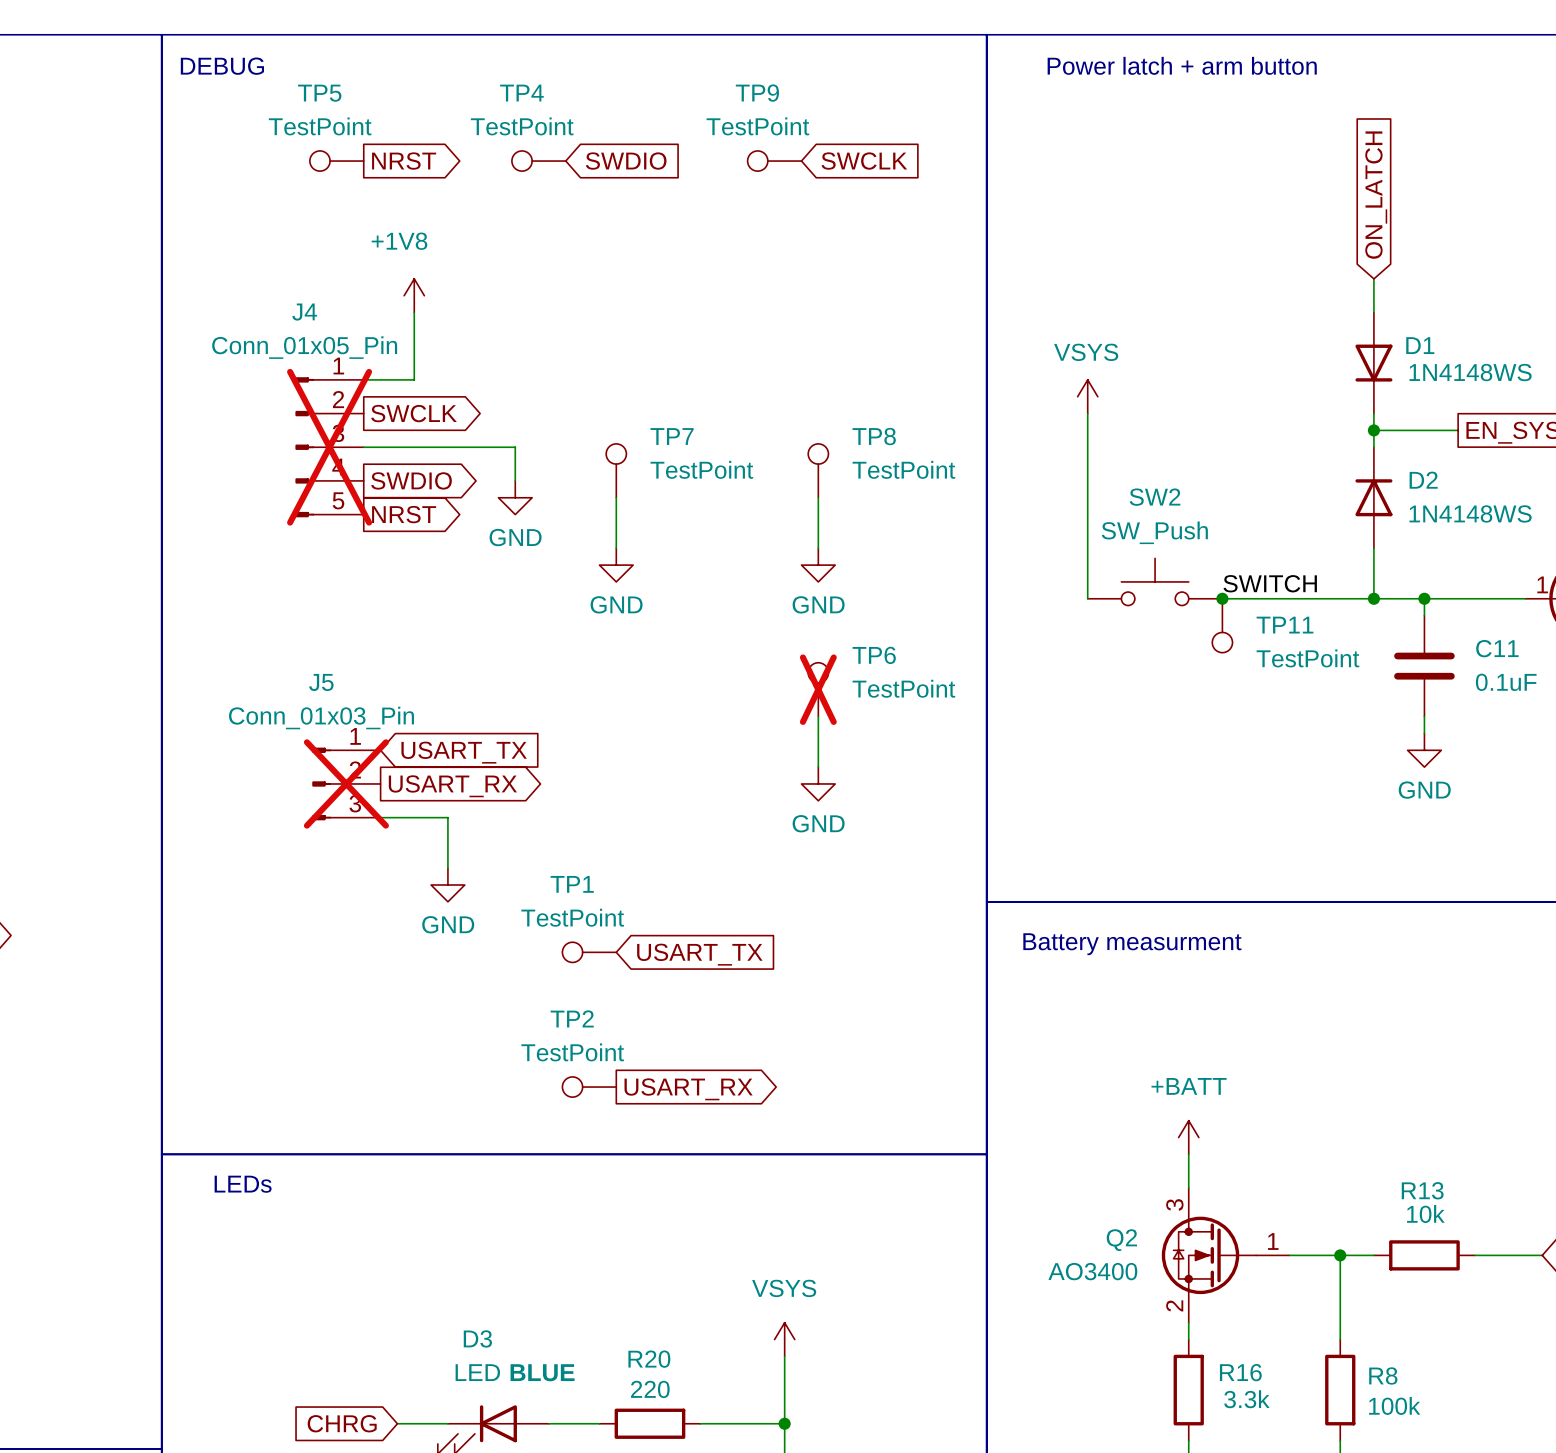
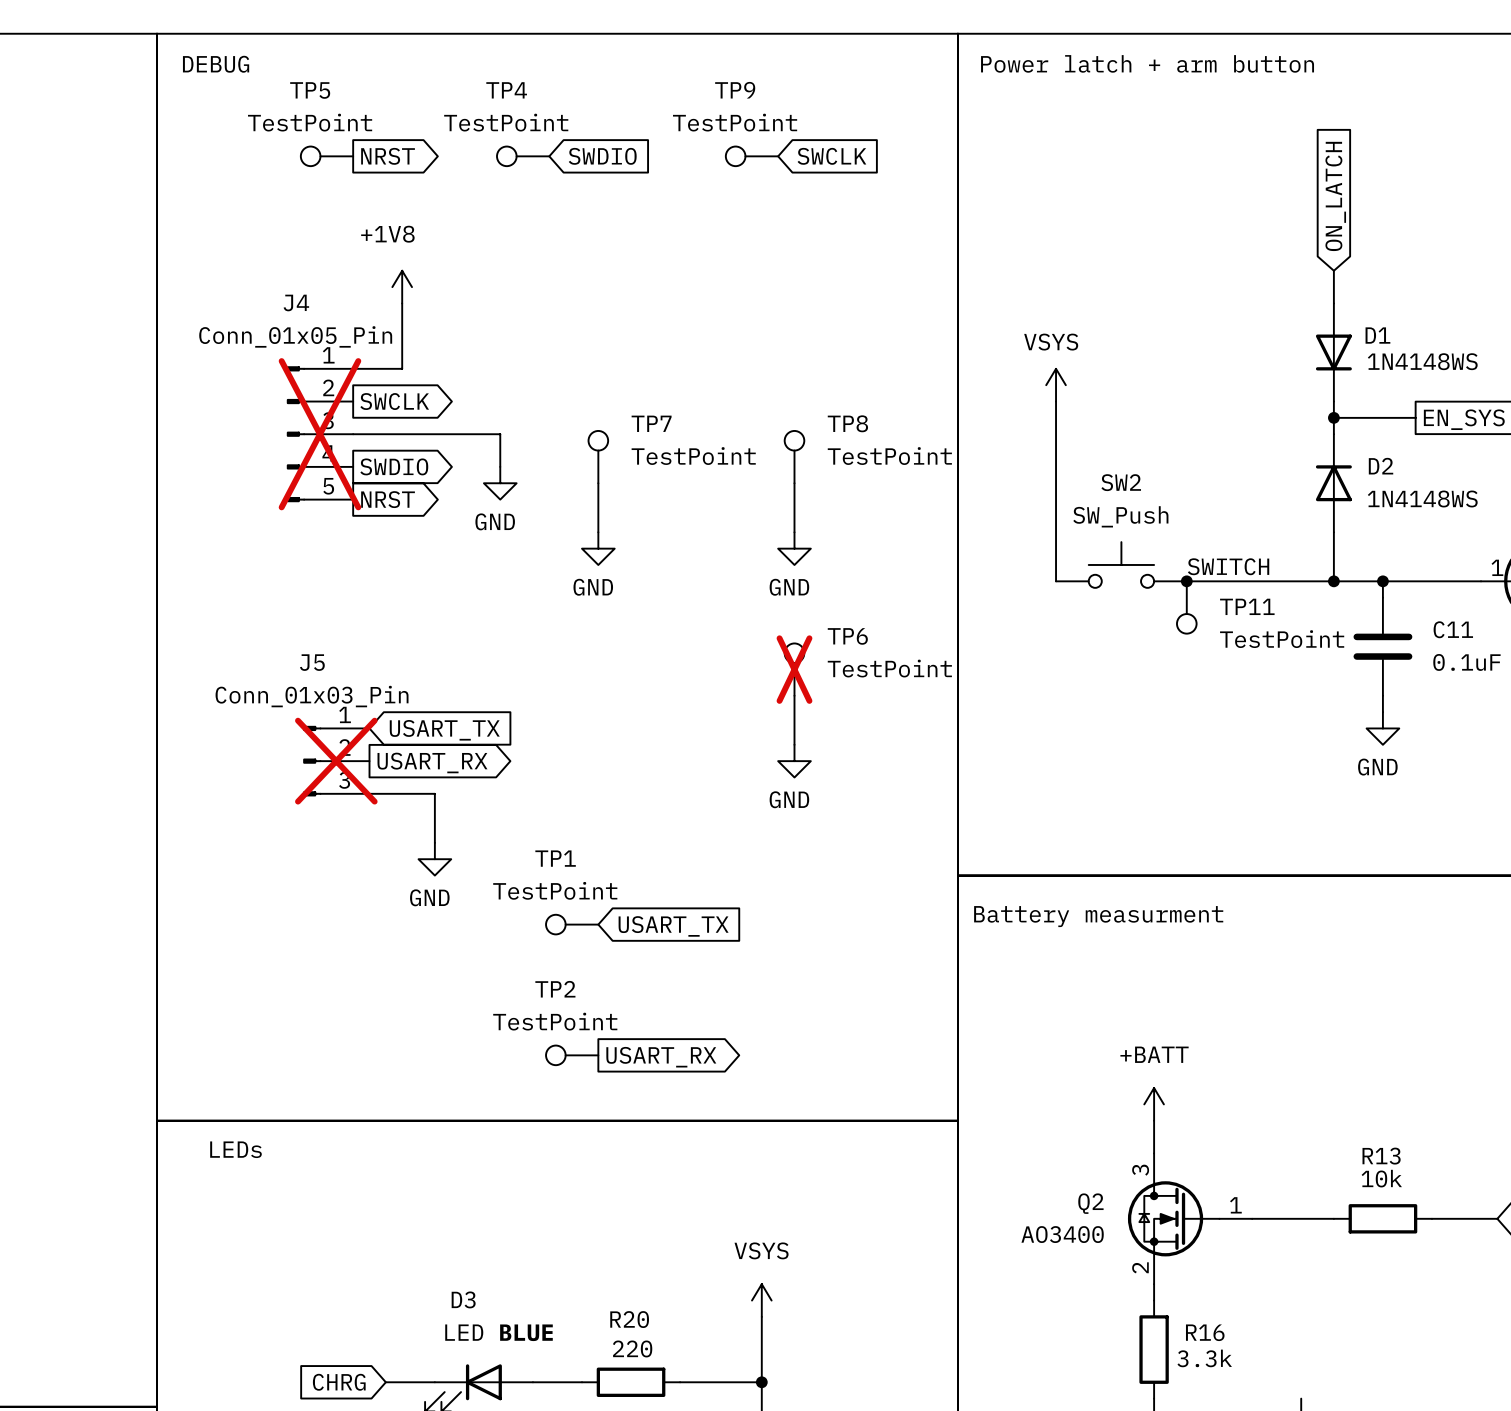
wire: (1340, 1255) (1340, 1339) -> none
junction: (1340, 1255) -> none
R8: 100k (1340, 1390) -> none

